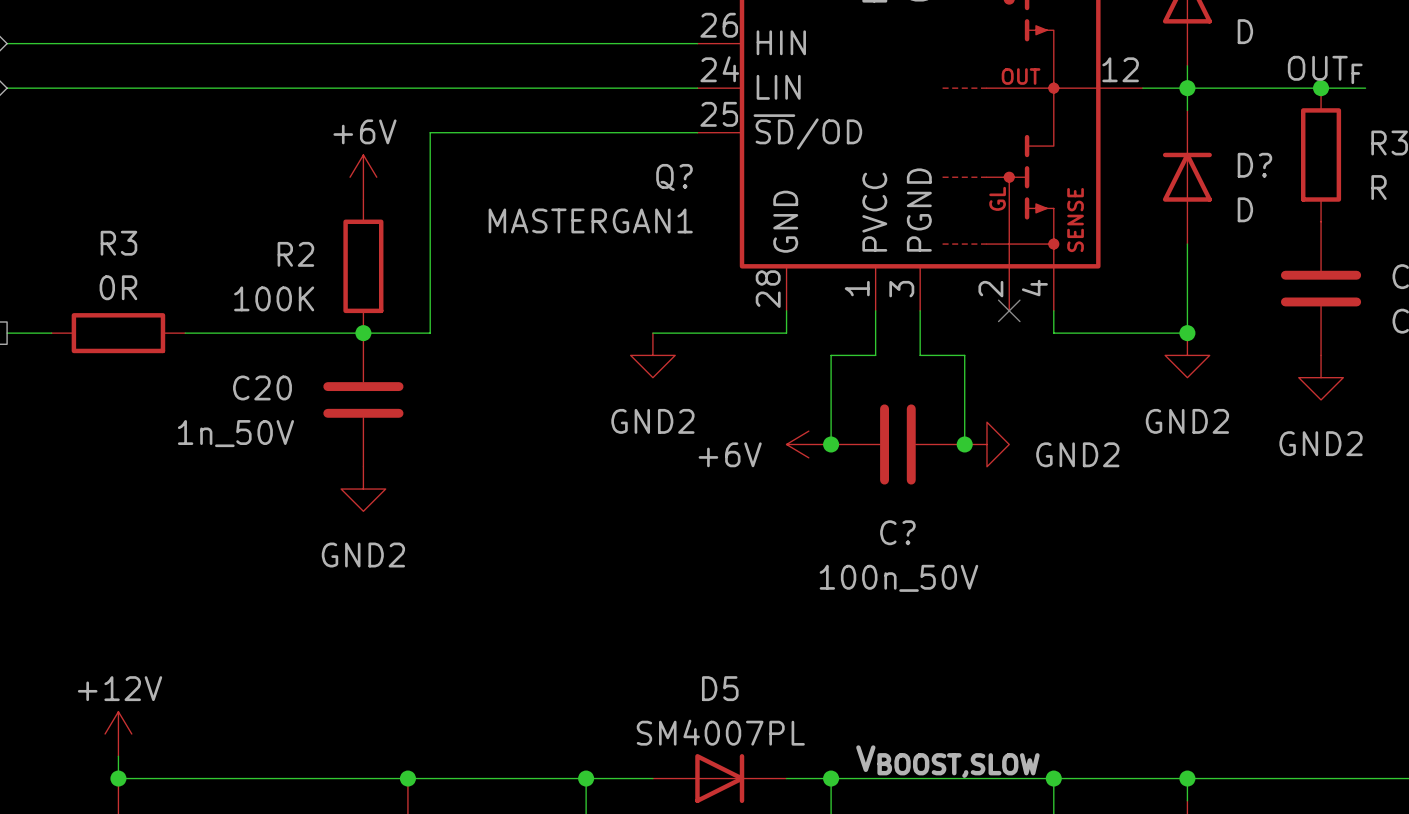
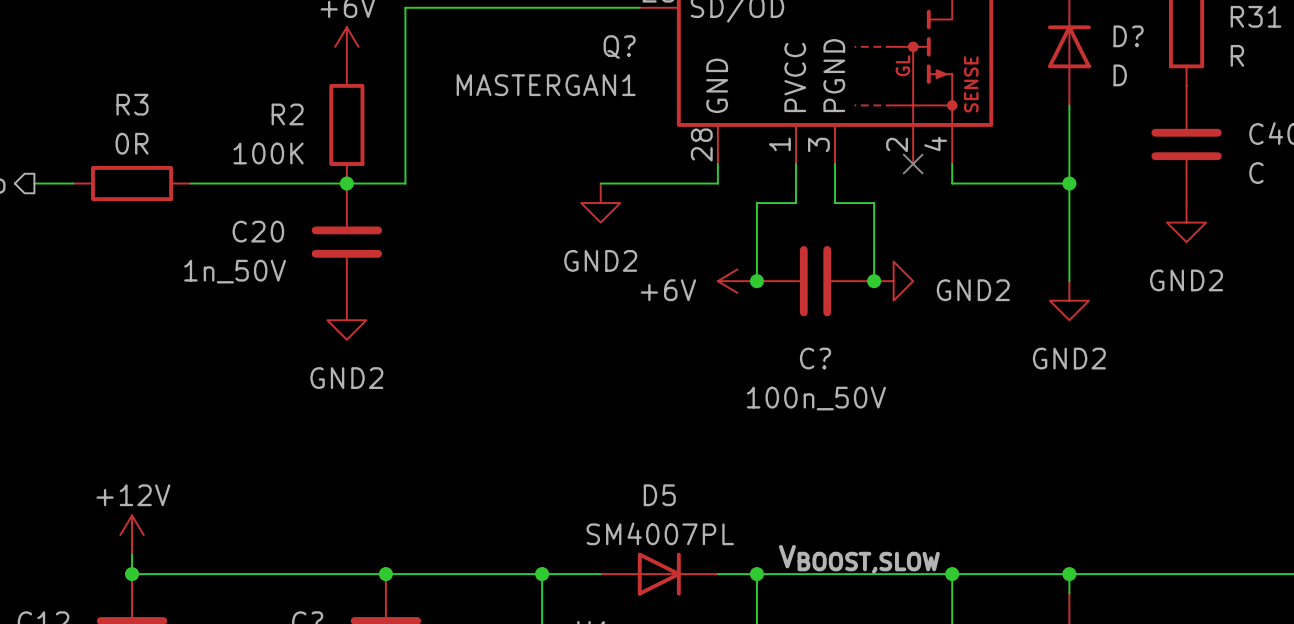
wire: none -> (1069, 183) (1069, 281)
power symbol position: GND2 (1187, 355) -> GND2 (1069, 300)

